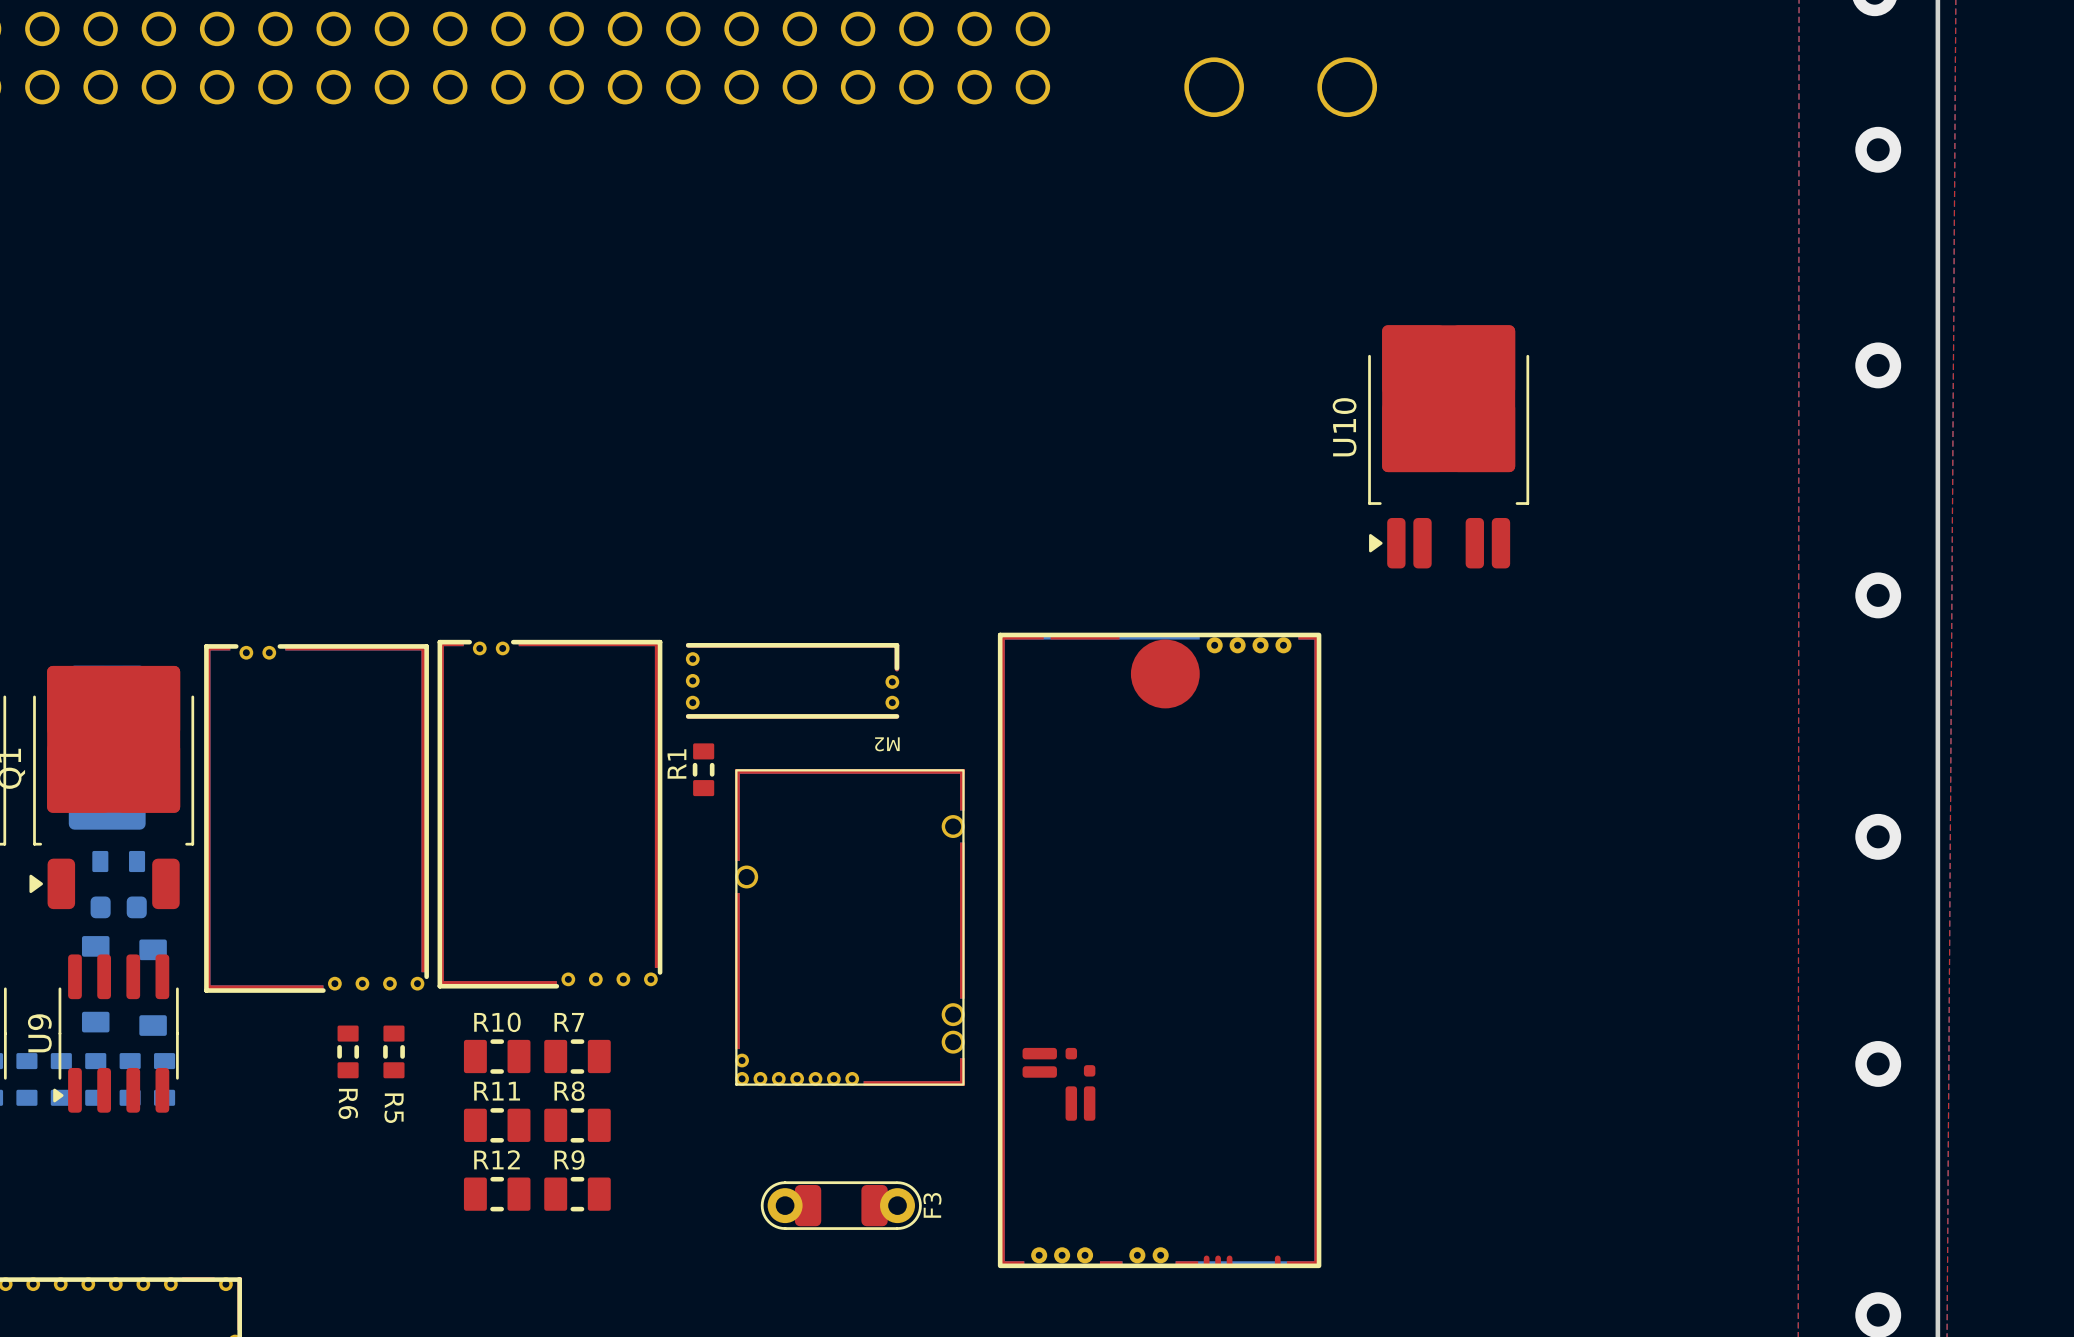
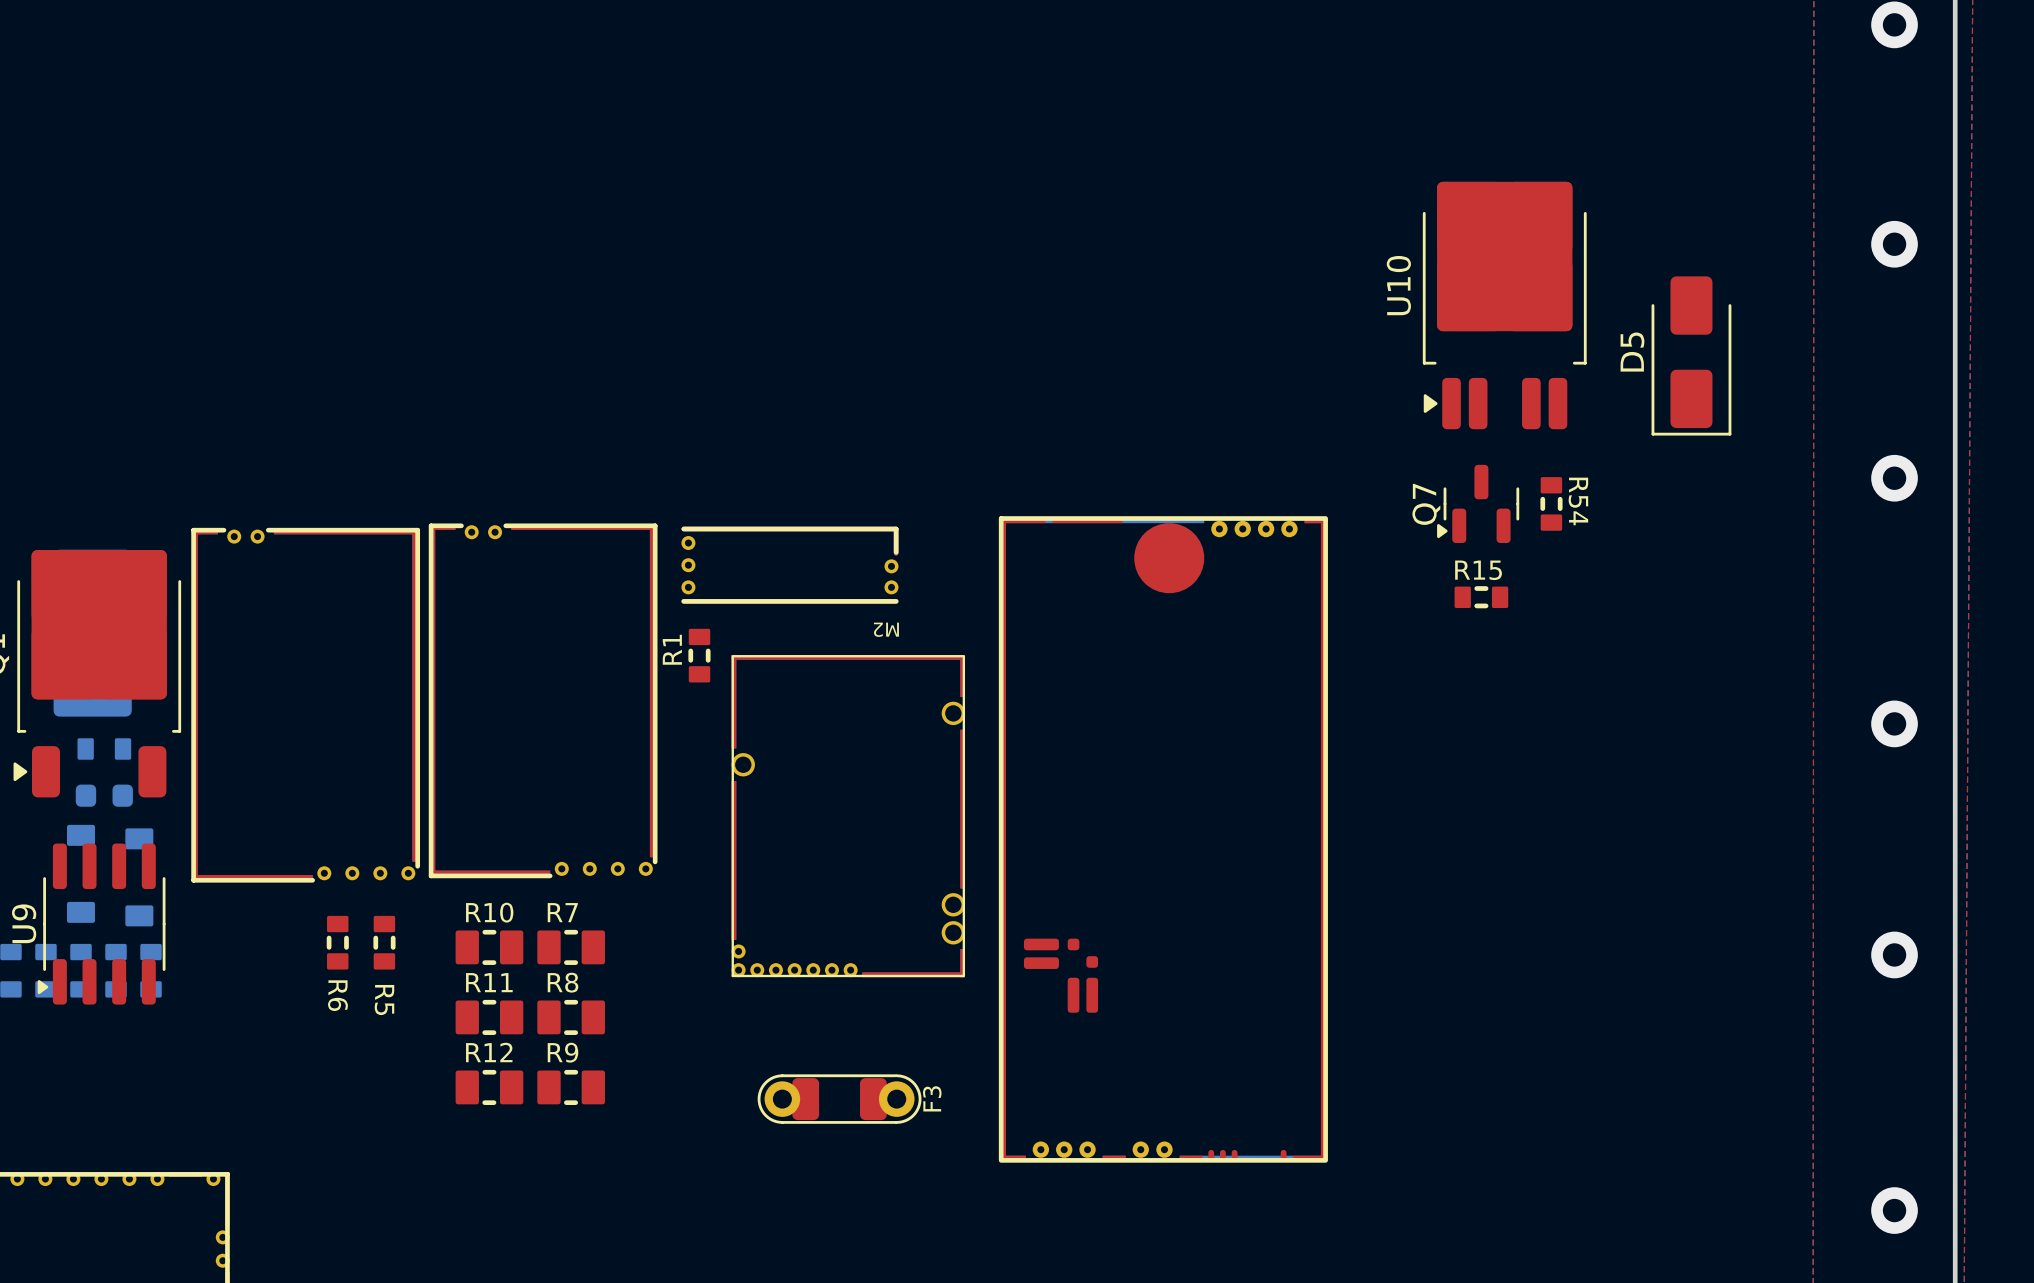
U10 position: (1448, 446) -> (1504, 305)
D5: none -> (1691, 355)
Q7: none -> (1478, 503)
R54: none -> (1551, 503)
R15: none -> (1481, 597)

